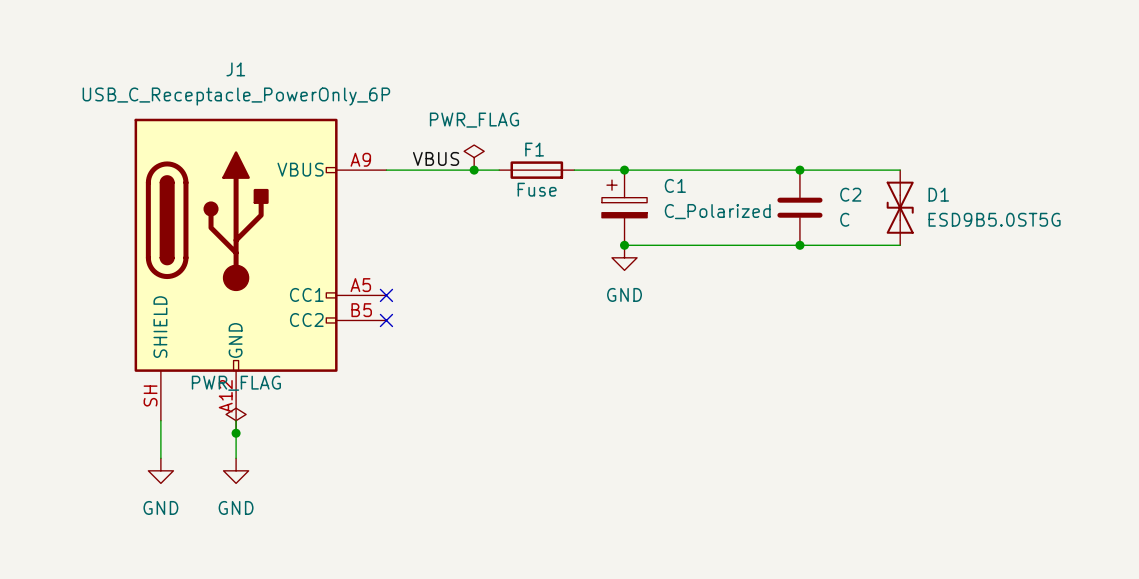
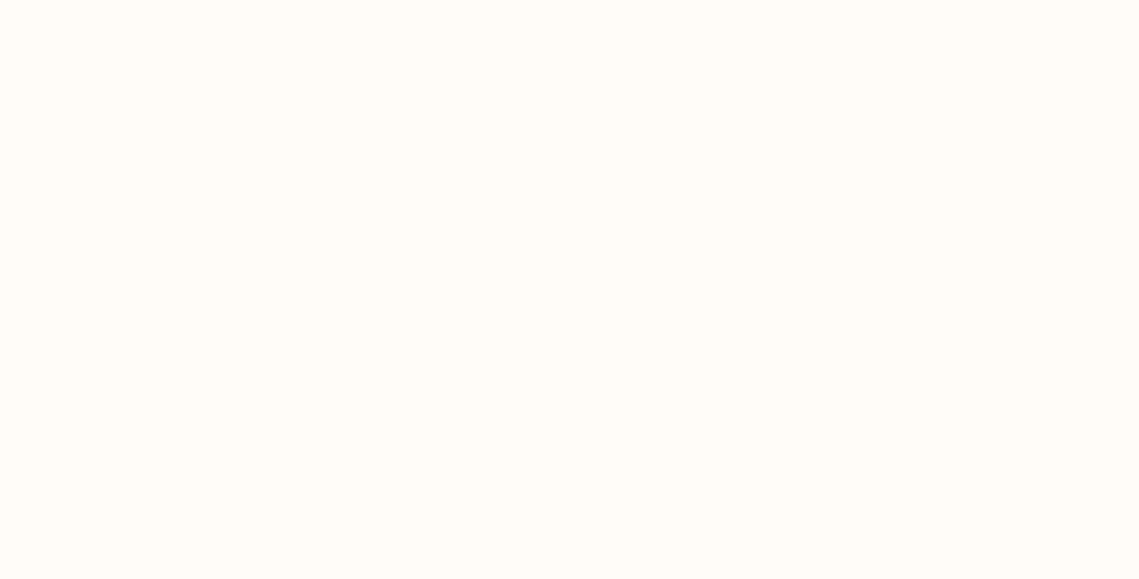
power symbol: PWR_FLAG (474, 157) -> none
label: VBUS (436, 158) -> none
wire: (386, 170) (499, 170) -> none
junction: (474, 170) -> none
F1: Fuse (536, 170) -> none
wire: (574, 170) (900, 170) -> none
junction: (624, 170) -> none
junction: (799, 170) -> none
C1: C_Polarized (624, 207) -> none
C2: C (799, 207) -> none
D1: ESD9B5.0ST5G (900, 207) -> none
wire: (624, 245) (900, 245) -> none
junction: (624, 245) -> none
junction: (799, 245) -> none
power symbol: GND (624, 257) -> none
J1: USB_C_Receptacle_PowerOnly_6P (260, 269) -> none
no-connect mark: (386, 295) -> none
no-connect mark: (386, 320) -> none
wire: (160, 420) (160, 458) -> none
wire: (236, 420) (236, 458) -> none
power symbol: PWR_FLAG (236, 420) -> none
junction: (236, 433) -> none
power symbol: GND (160, 470) -> none
power symbol: GND (236, 470) -> none

